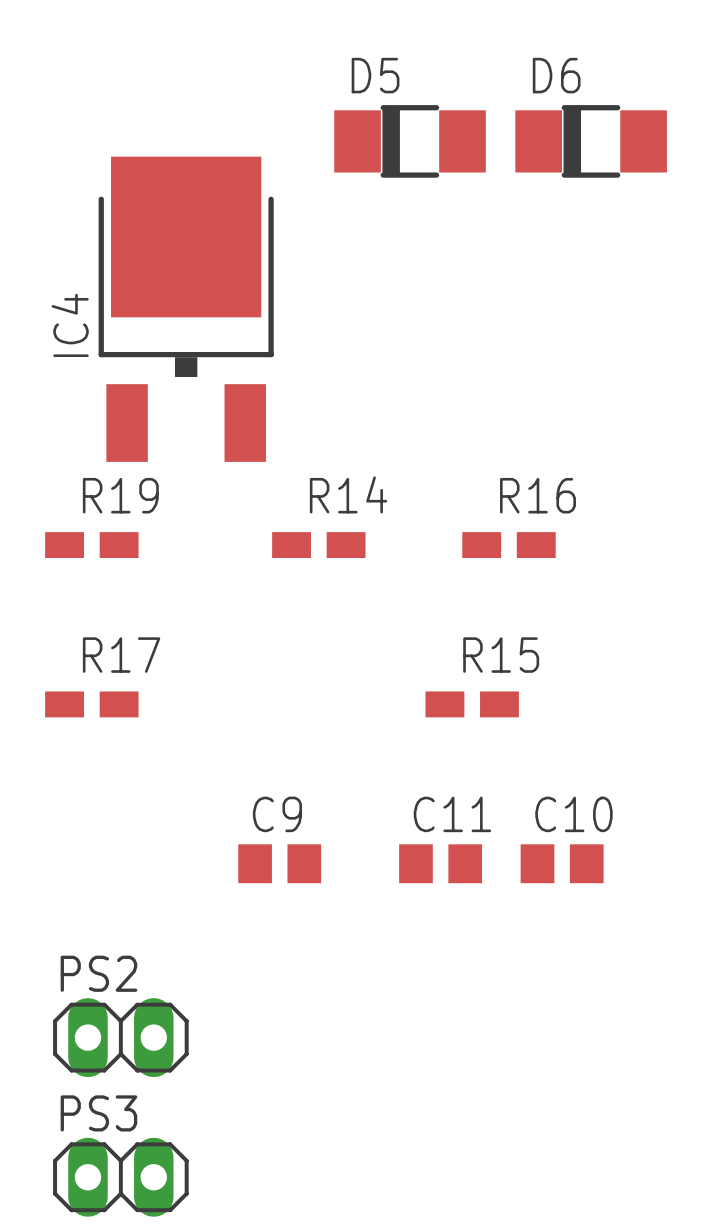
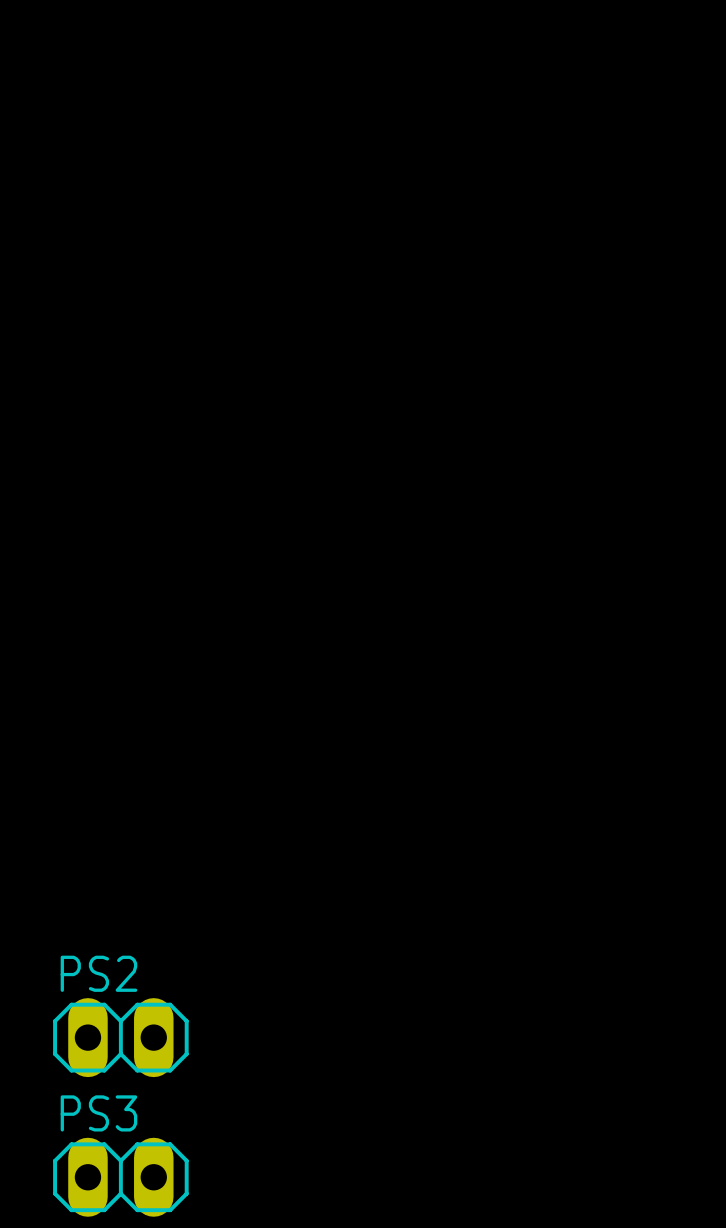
D5: (410, 141) -> none
D6: (591, 141) -> none
IC4: (186, 309) -> none
R19: (91, 545) -> none
R14: (318, 545) -> none
R16: (508, 545) -> none
R17: (91, 704) -> none
R15: (472, 704) -> none
C9: (279, 863) -> none
C11: (440, 863) -> none
C10: (562, 863) -> none

